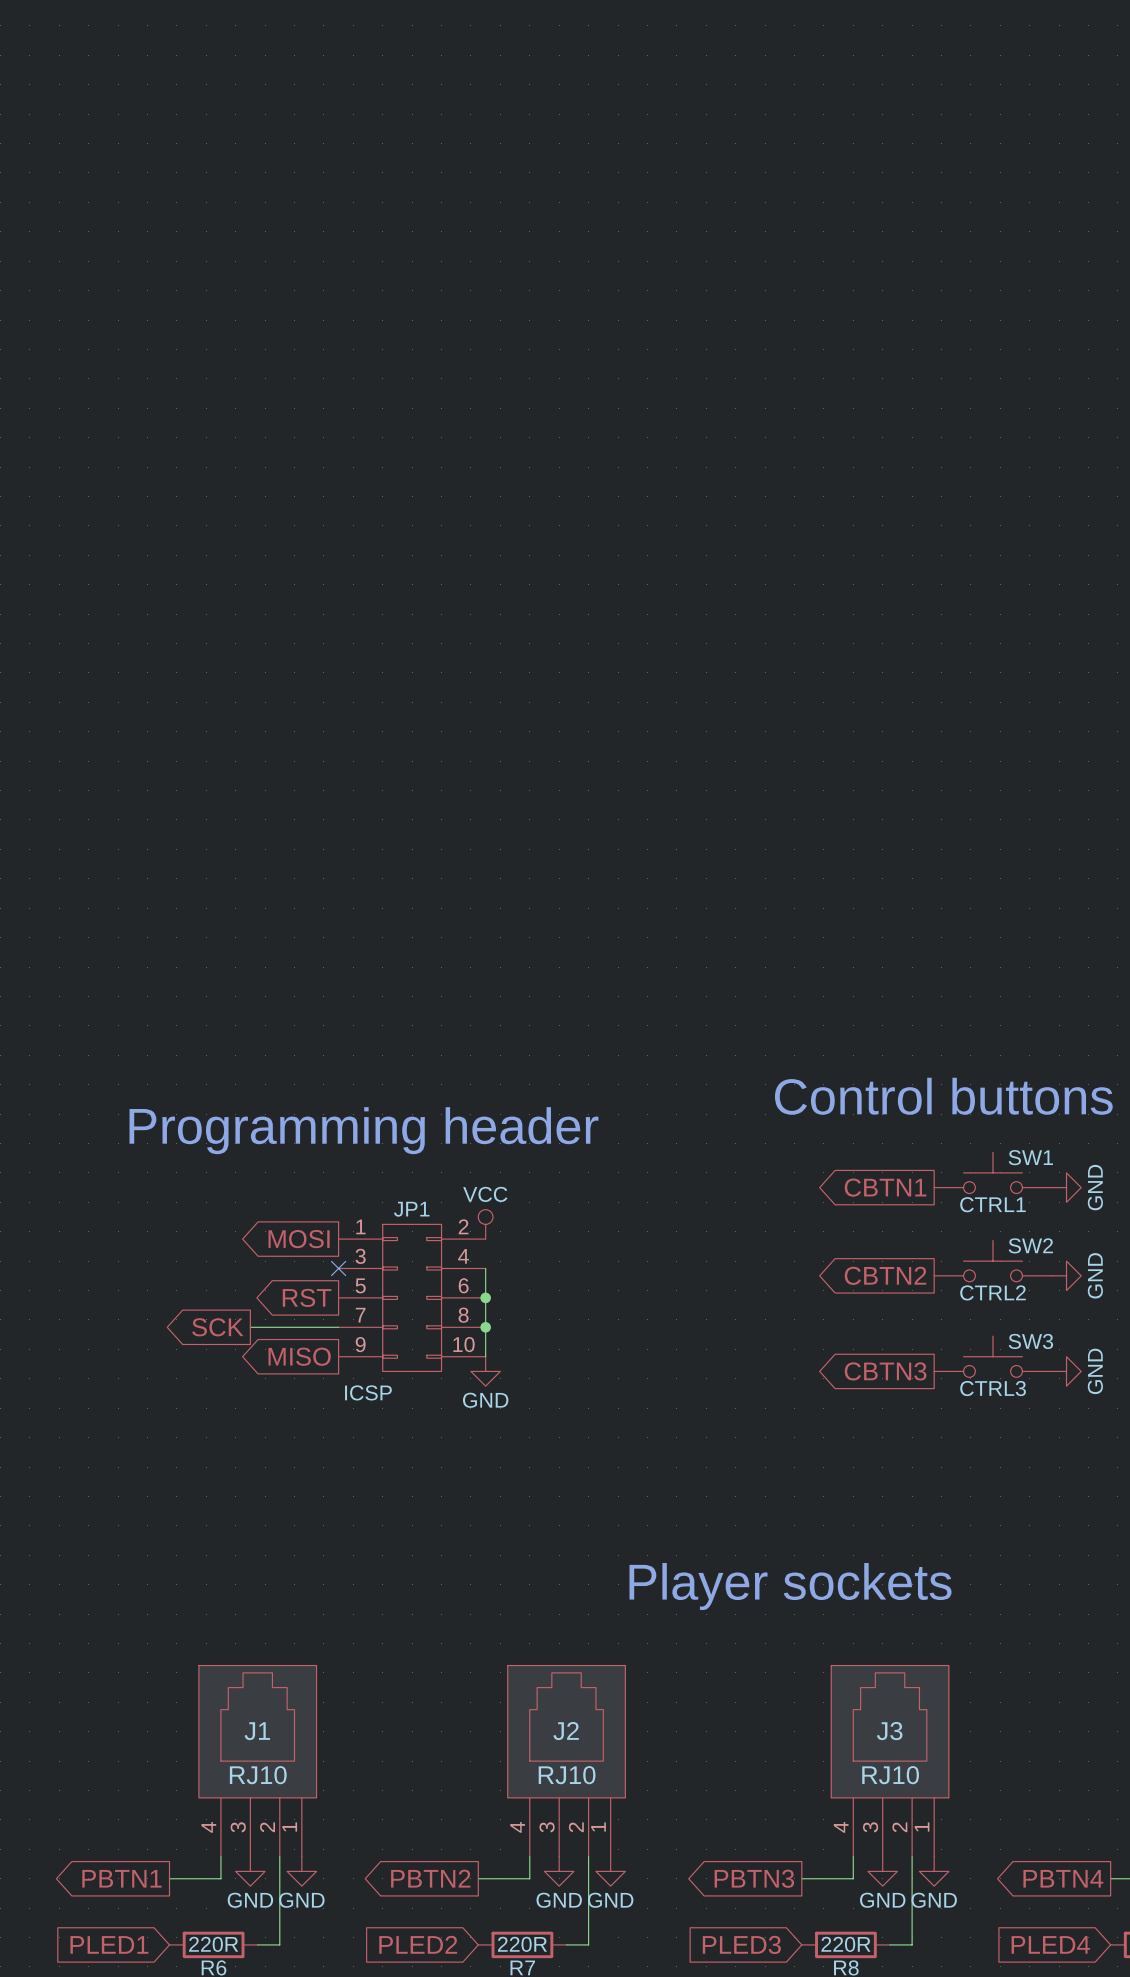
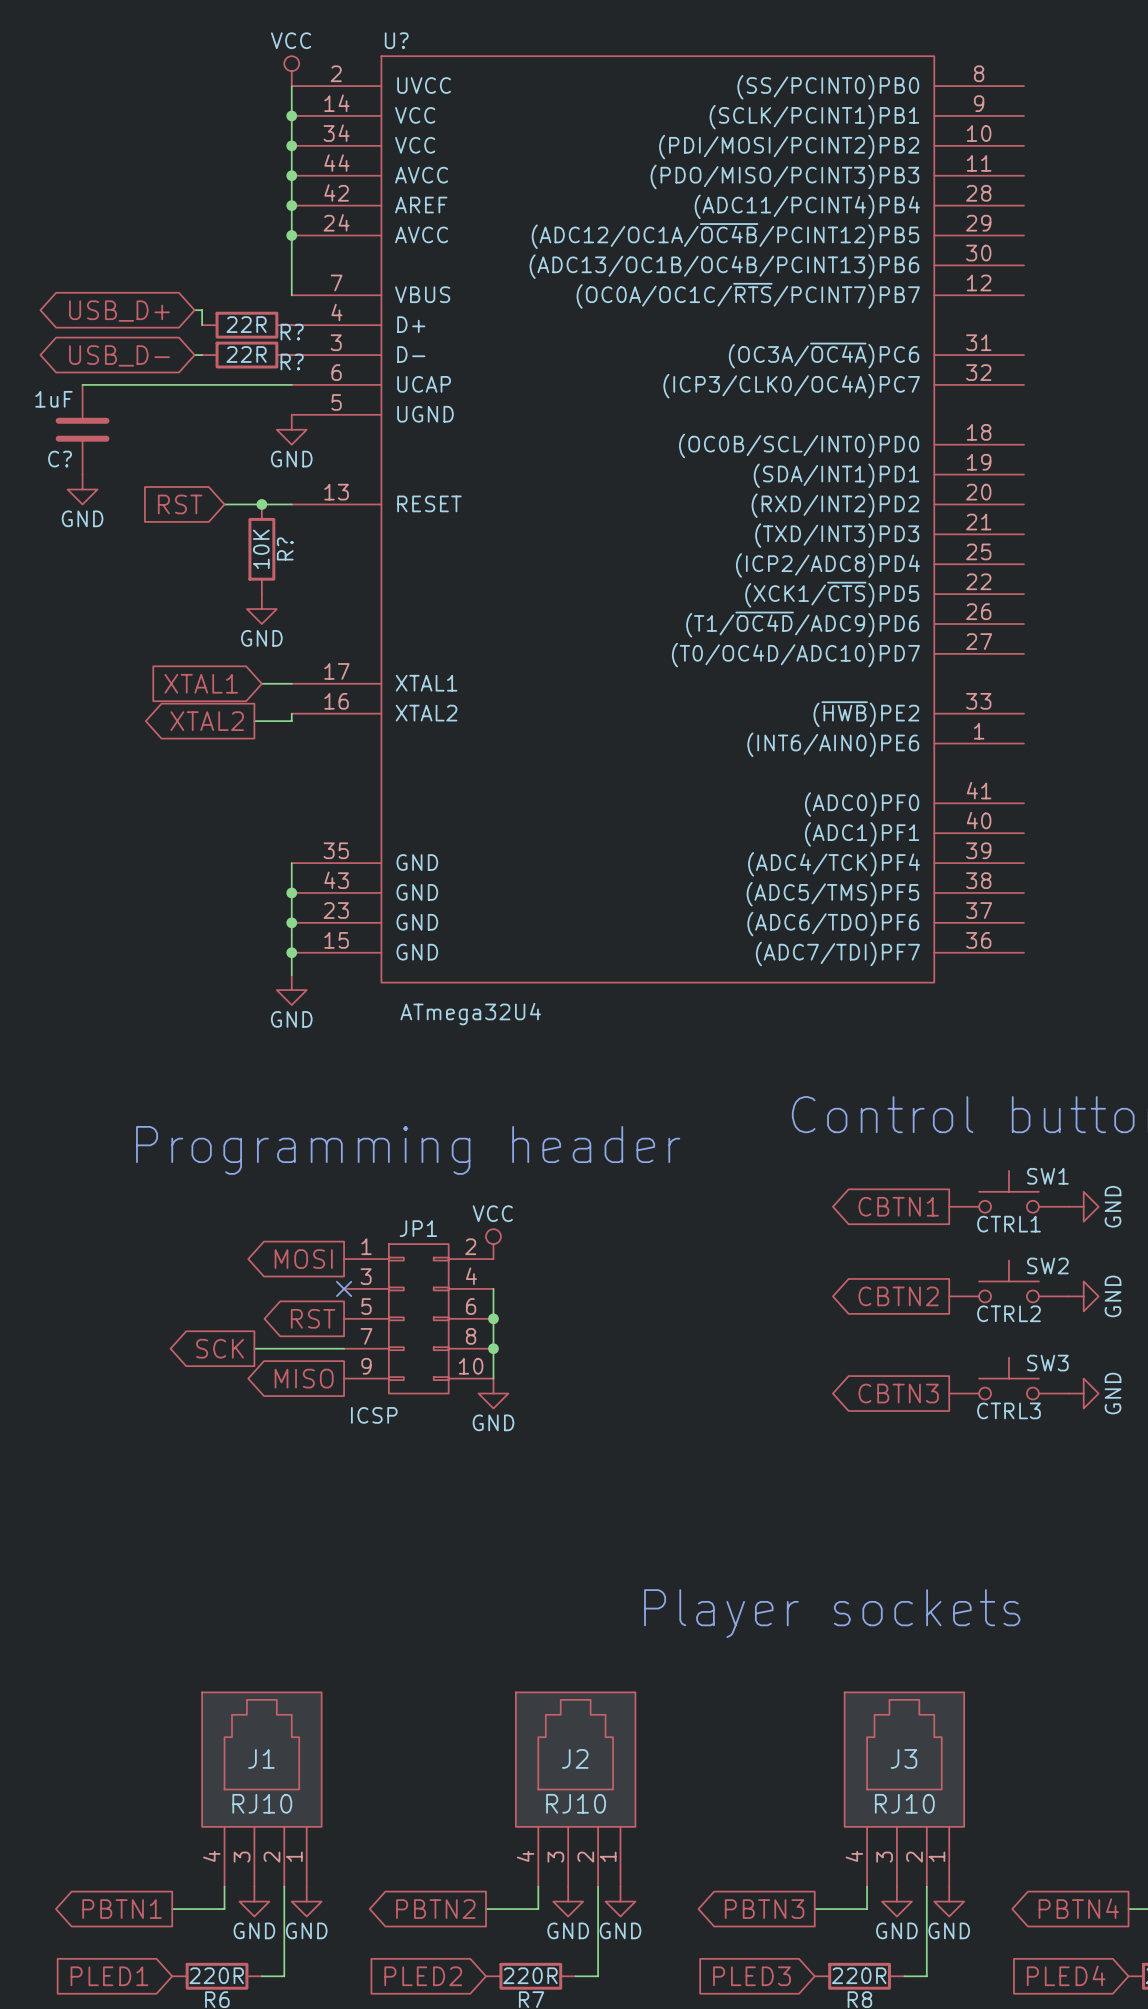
power symbol: none -> VCC (291, 71)
wire: none -> (291, 86) (291, 295)
junction: none -> (291, 115)
junction: none -> (291, 145)
junction: none -> (291, 175)
junction: none -> (291, 205)
junction: none -> (291, 235)
wire: none -> (194, 310) (202, 310) (202, 325)
global label: none -> USB_D+ (119, 311)
R?: none -> 22R (246, 325)
wire: none -> (194, 355) (202, 355)
R?: none -> 22R (246, 355)
global label: none -> USB_D- (119, 355)
wire: none -> (82, 384) (291, 384)
C?: none -> 1uF (82, 429)
power symbol: none -> GND (291, 429)
power symbol: none -> GND (82, 489)
global label: none -> RST (180, 504)
wire: none -> (224, 504) (291, 504)
junction: none -> (261, 504)
U?: none -> ATmega32U4 (657, 519)
R?: none -> 10K (261, 549)
power symbol: none -> GND (261, 609)
global label: none -> XTAL1 (201, 683)
wire: none -> (261, 683) (291, 683)
wire: none -> (291, 713) (291, 721) (254, 721)
global label: none -> XTAL2 (207, 721)
wire: none -> (291, 863) (291, 975)
junction: none -> (291, 892)
junction: none -> (291, 922)
junction: none -> (291, 952)
power symbol: none -> GND (291, 990)

